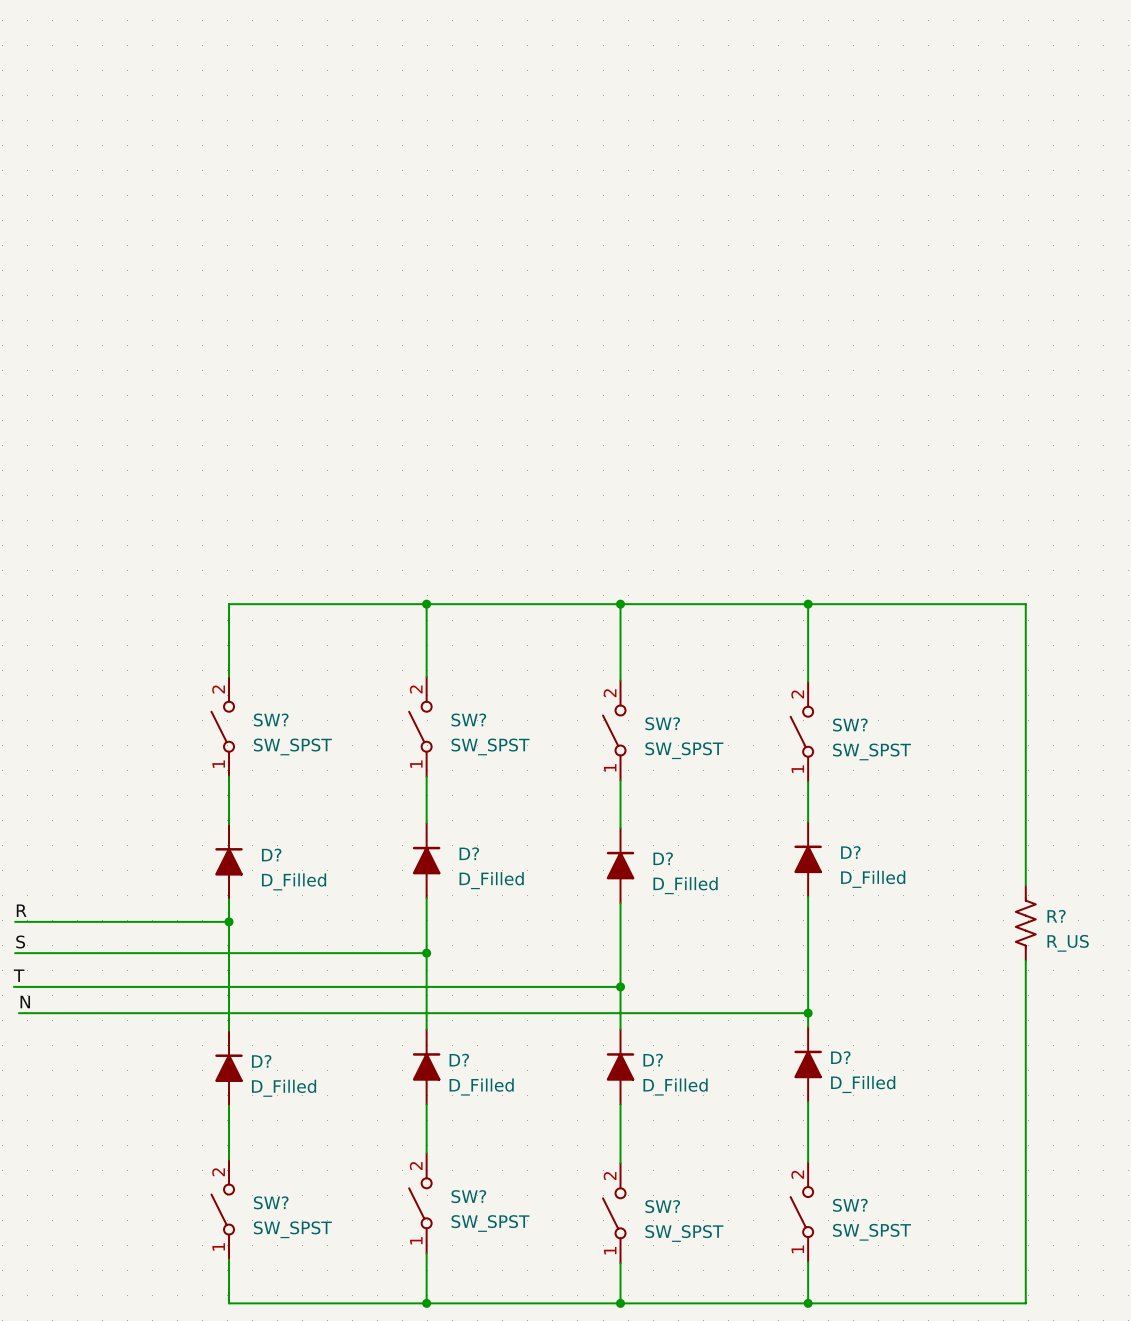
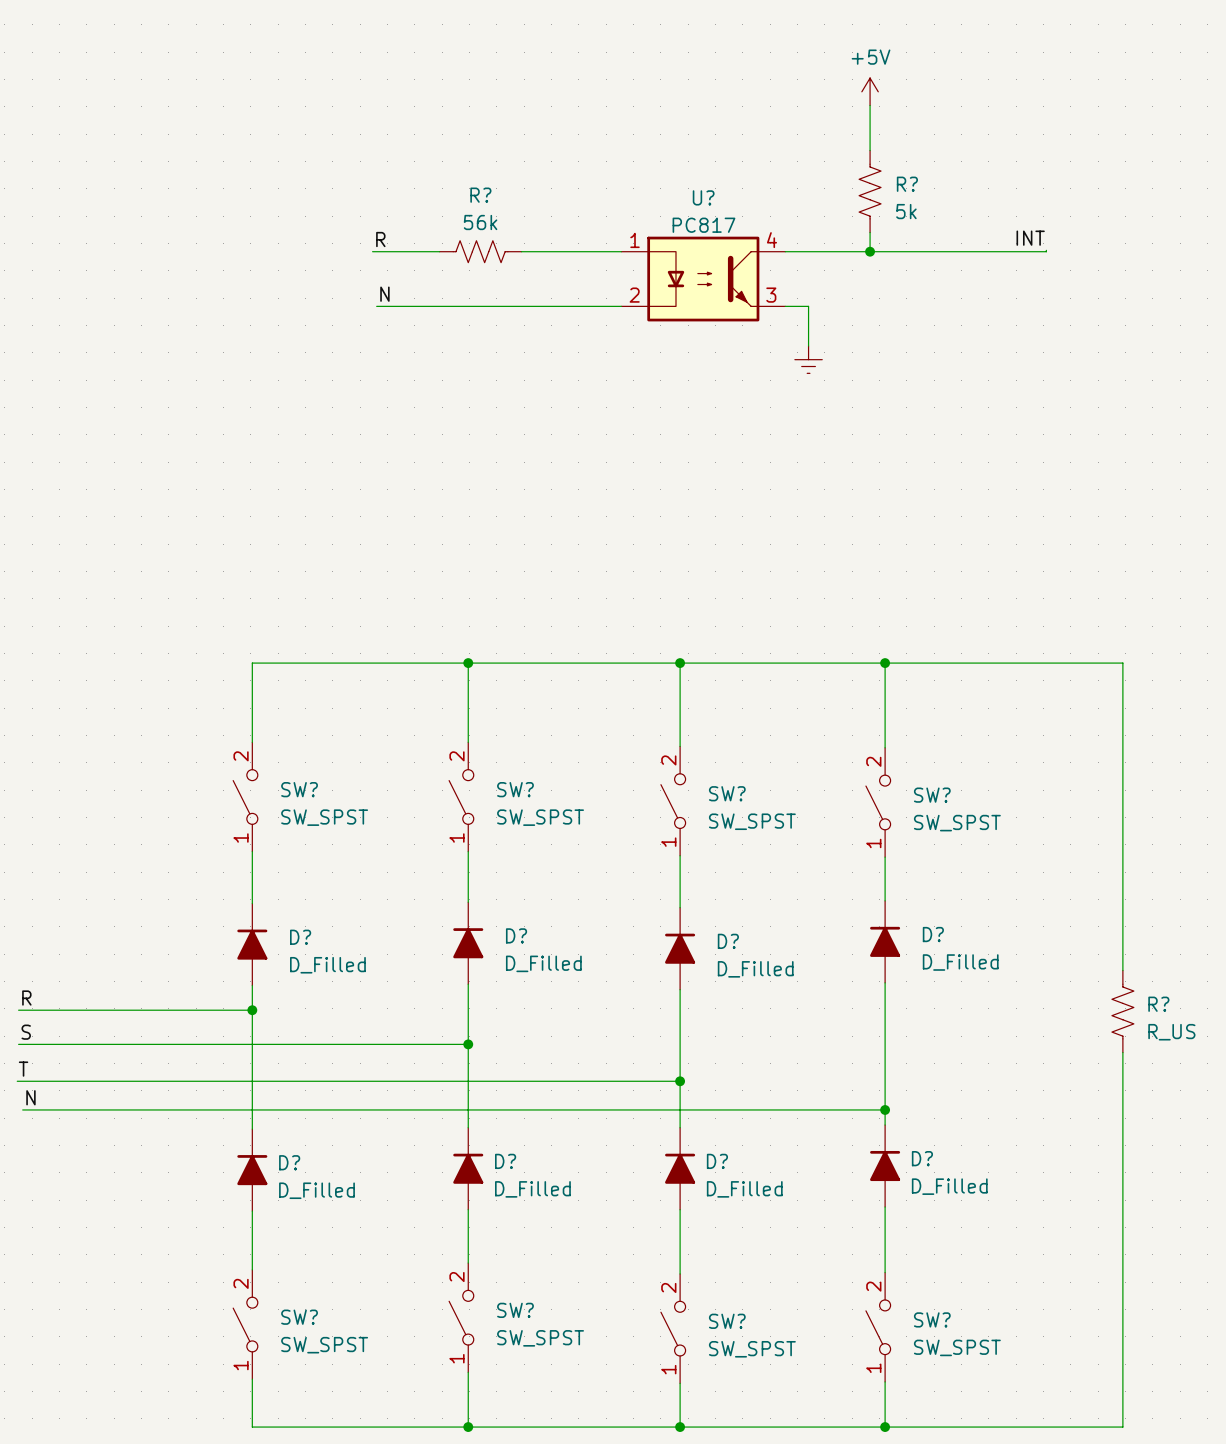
power symbol: none -> +5V (870, 91)
wire: none -> (870, 105) (870, 150)
R?: none -> 5k (870, 191)
wire: none -> (870, 232) (870, 251)
label: none -> INT (1030, 238)
label: none -> R (380, 239)
wire: none -> (1046, 250) (785, 251)
wire: none -> (372, 251) (439, 251)
R?: none -> 56k (480, 251)
wire: none -> (521, 251) (621, 251)
junction: none -> (870, 251)
U?: none -> PC817 (703, 279)
label: none -> N (384, 294)
wire: none -> (376, 306) (621, 306)
wire: none -> (785, 306) (808, 306) (808, 346)
power symbol: none -> (808, 359)

